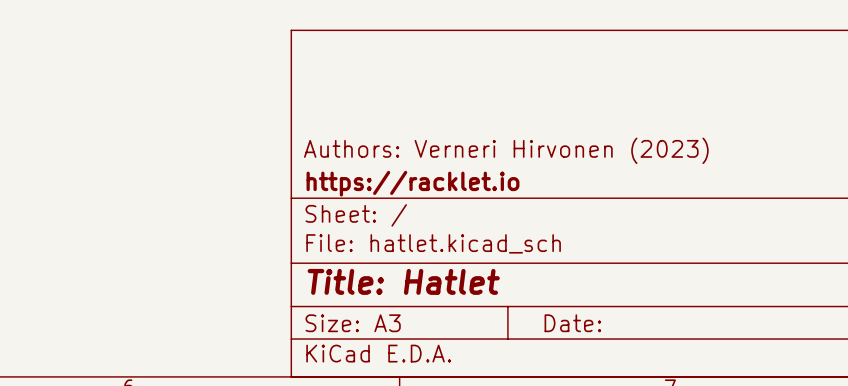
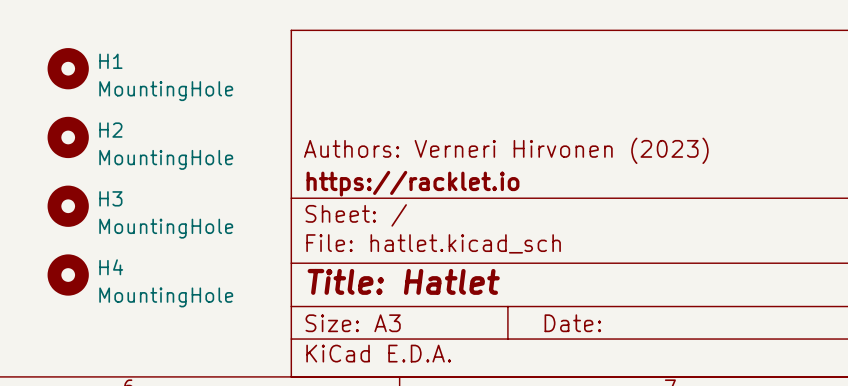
H1: none -> MountingHole (68, 68)
H2: none -> MountingHole (68, 137)
H3: none -> MountingHole (68, 206)
H4: none -> MountingHole (68, 275)

